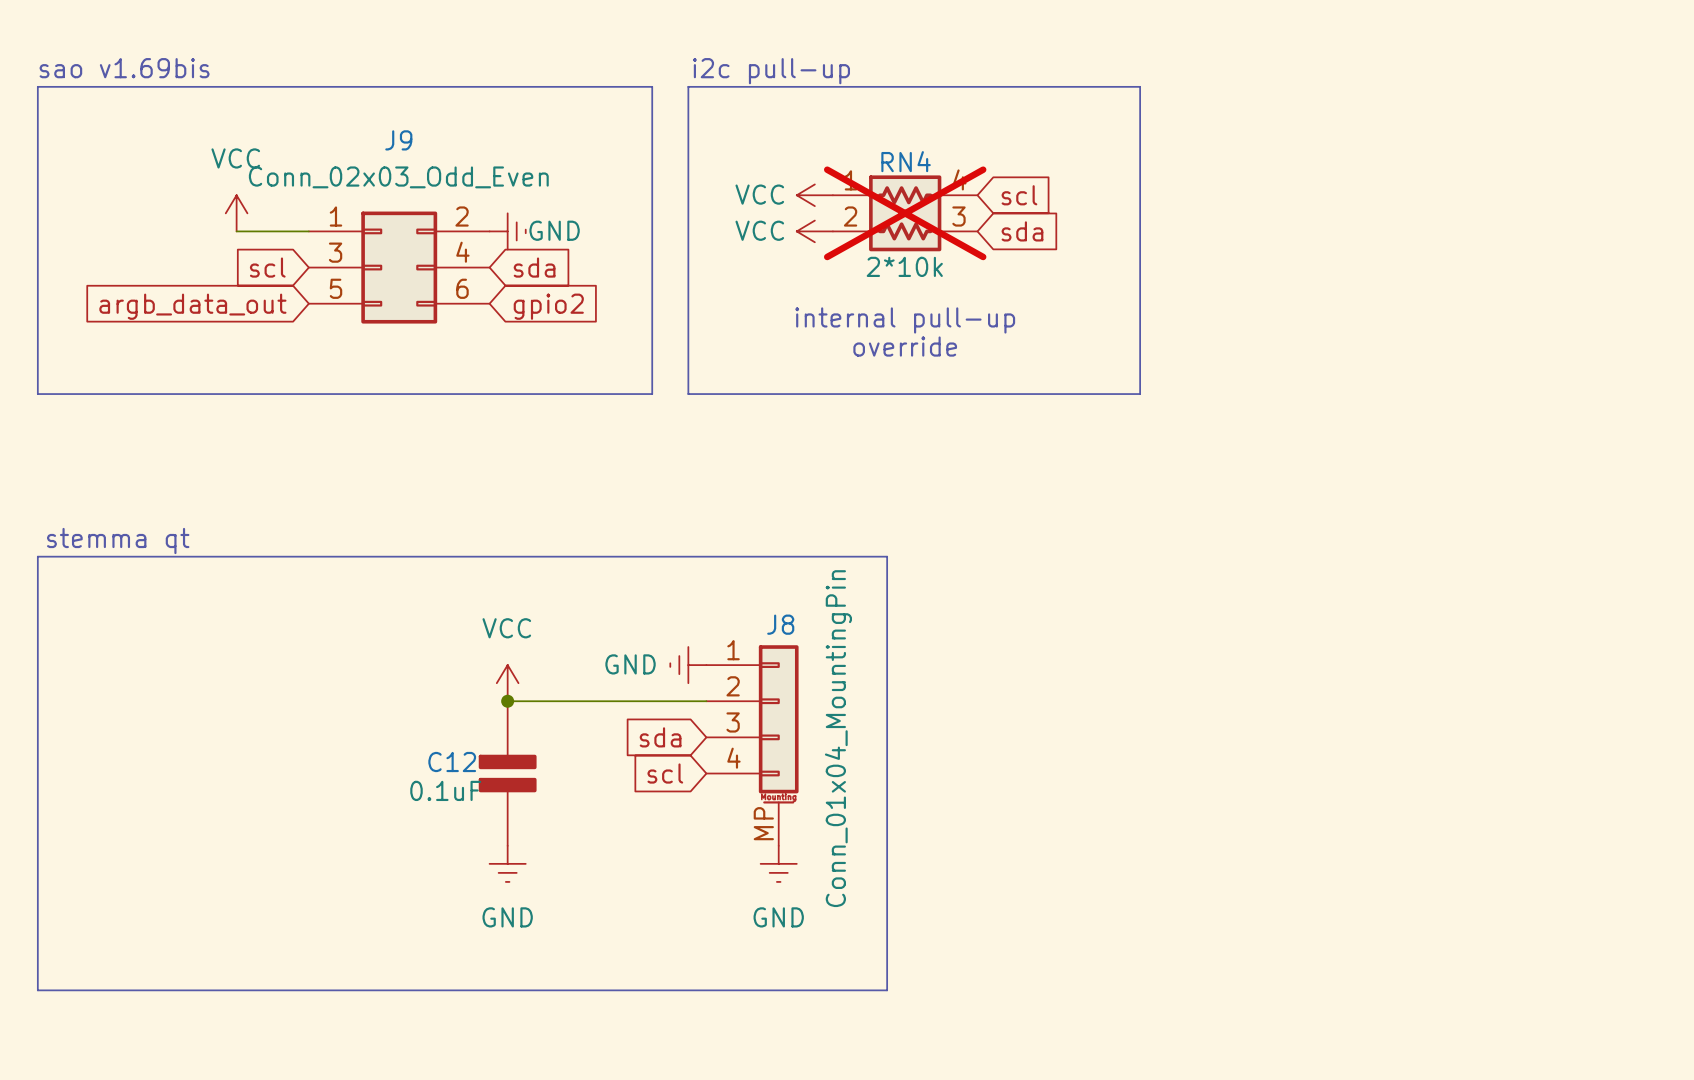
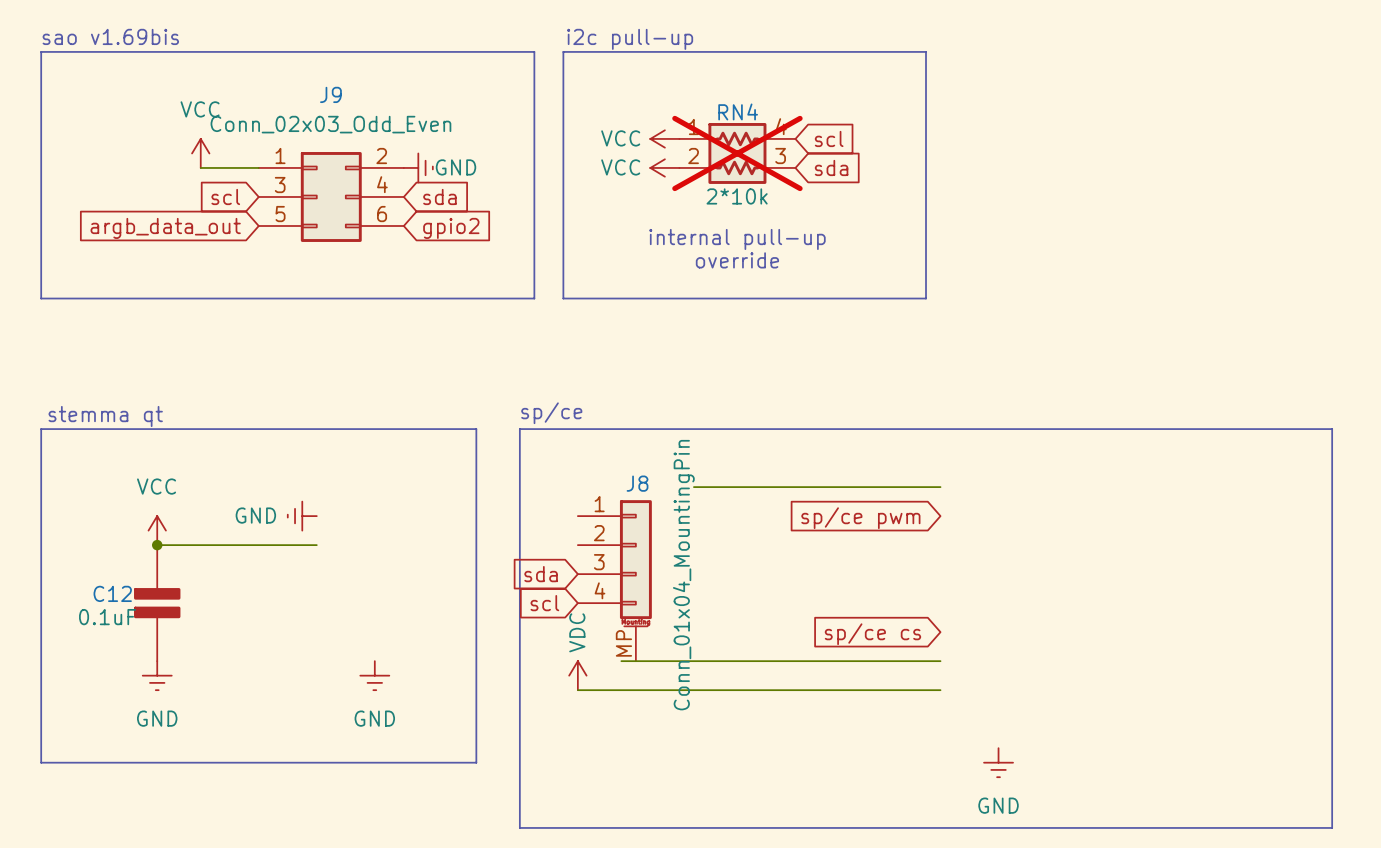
text: none -> sp/ce (551, 413)
line: (579, 556) (634, 556) -> (722, 429) (1332, 429) (1332, 827) (519, 827) (519, 429)
line: (887, 556) (887, 990) (37, 990) (37, 972) -> (476, 429) (476, 762) (41, 762)
wire: none -> (693, 487) (940, 487)
power symbol: none -> GND (302, 516)
power symbol: GND (688, 665) -> none
global label: none -> sp/ce pwm (860, 518)
power symbol position: VCC (507, 683) -> VCC (157, 530)
junction: none -> (157, 545)
wire: (507, 701) (706, 701) -> (157, 545) (316, 545)
junction: (507, 701) -> none
C12 position: (507, 773) -> (157, 603)
global label: none -> sp/ce cs (872, 634)
wire: none -> (621, 661) (940, 661)
power symbol: none -> GND (157, 675)
power symbol position: GND (507, 863) -> GND (374, 675)
power symbol: none -> VDC (577, 675)
power symbol: GND (778, 863) -> none
wire: none -> (577, 690) (940, 690)
power symbol: none -> GND (998, 762)

